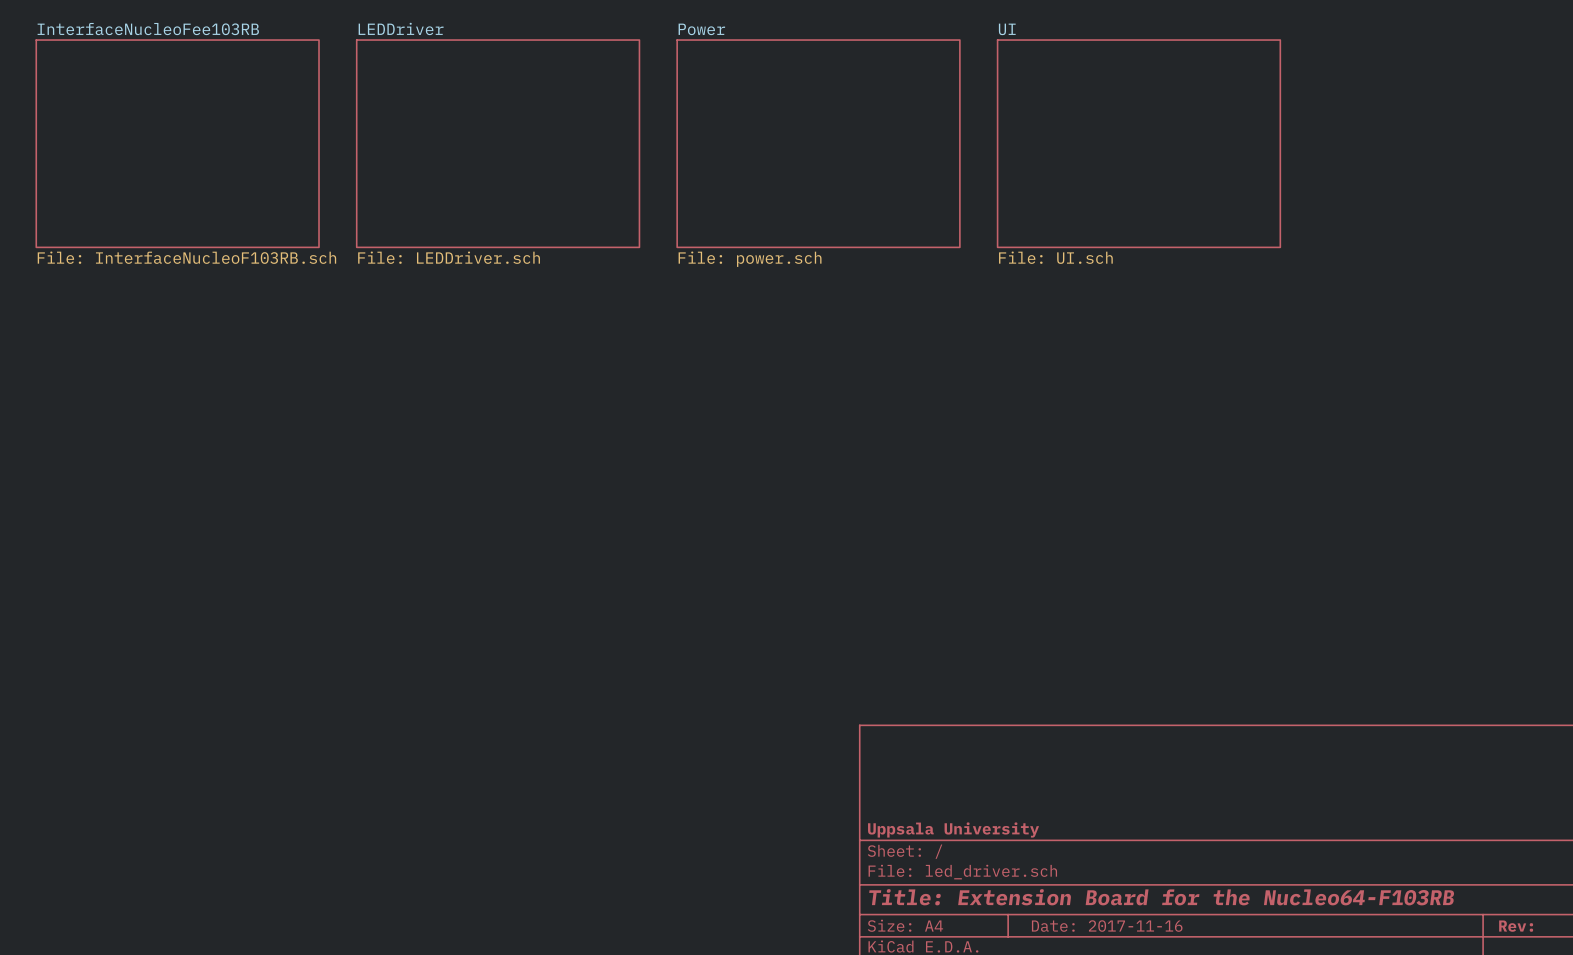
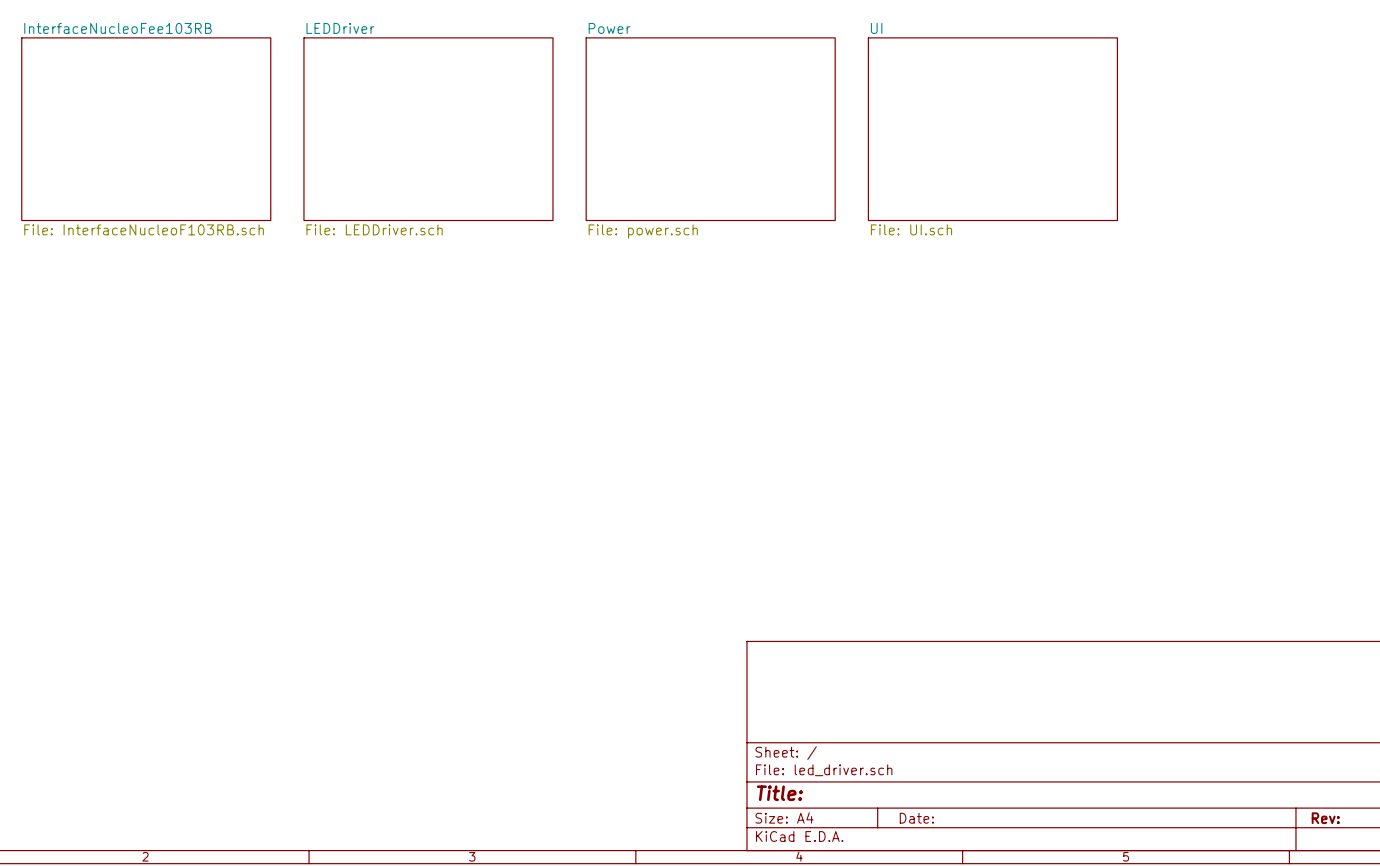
title block: Uppsala University (953, 829) -> none
title block: Title: Extension Board for the Nucleo64-F103RB (1161, 897) -> Title: (779, 793)
title block: Date: 2017-11-16 (1107, 926) -> Date: (916, 818)

